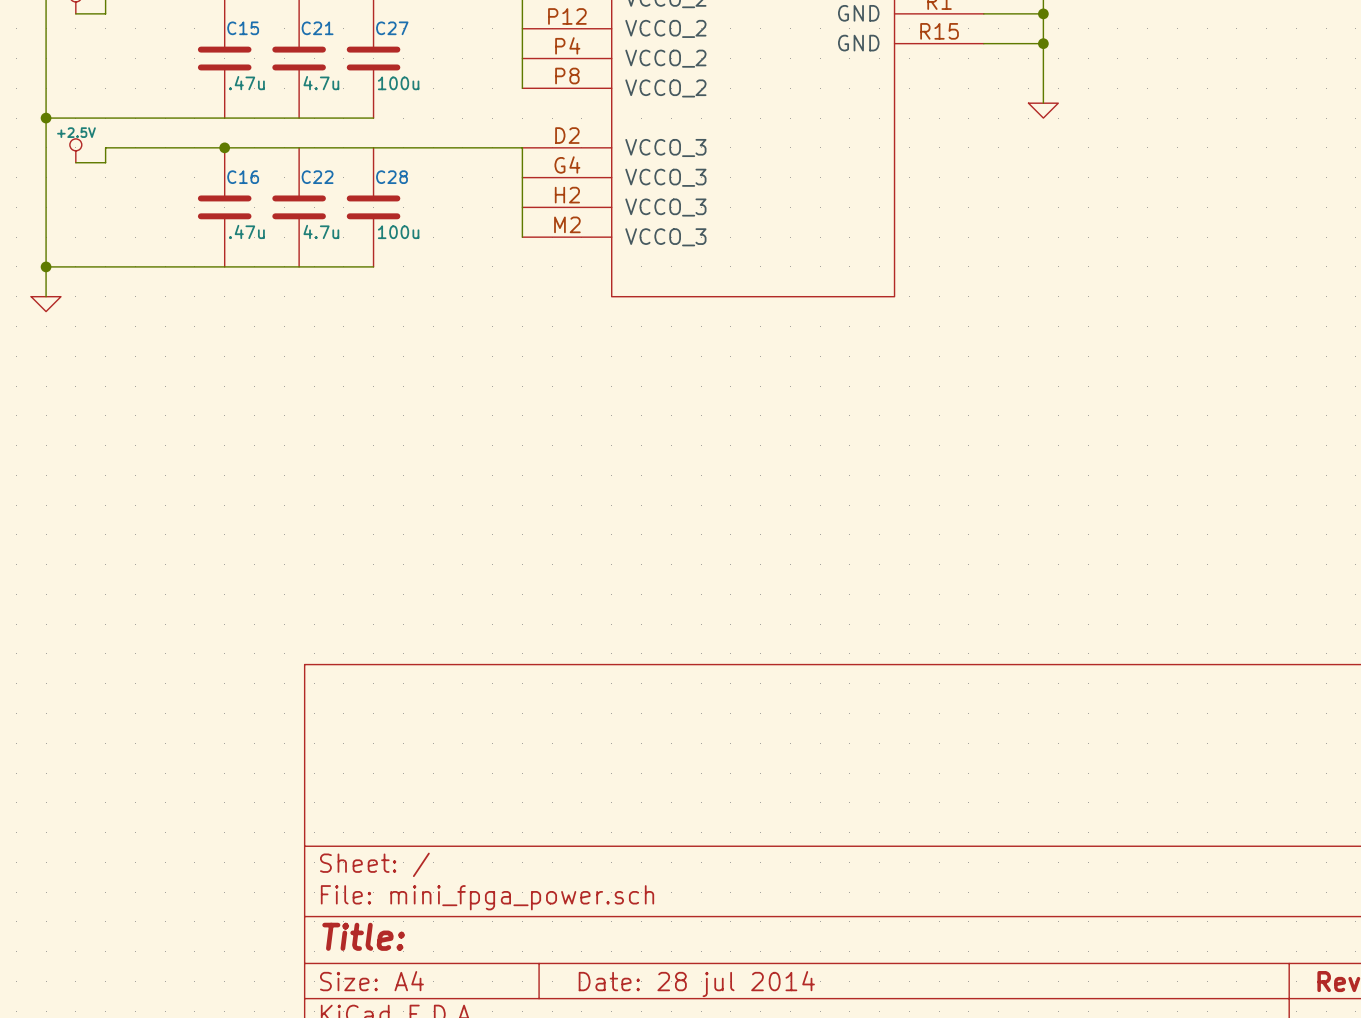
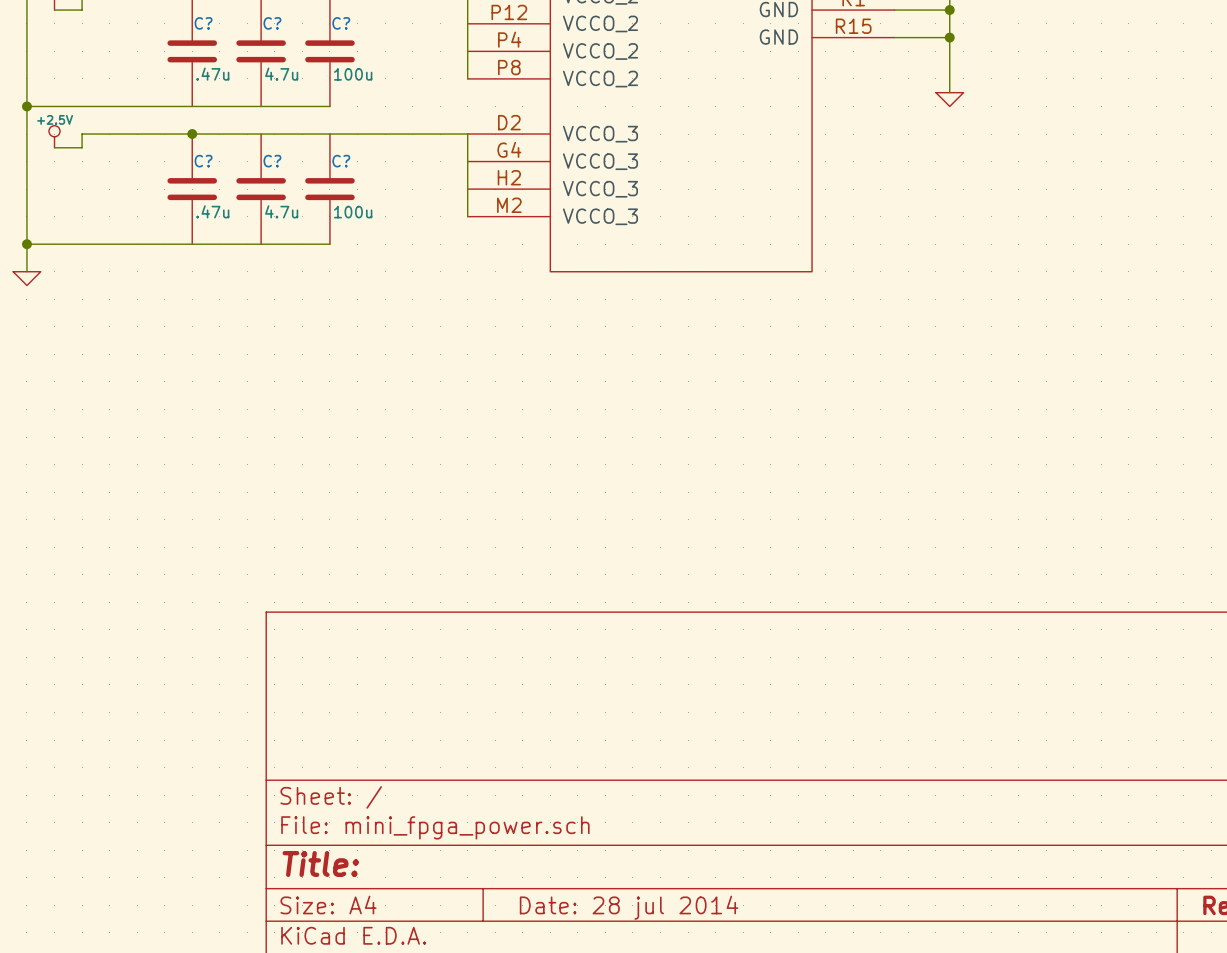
C15 name: C15 (243, 28) -> C? (203, 23)
C21 name: C21 (317, 28) -> C? (272, 23)
C27 name: C27 (392, 28) -> C? (341, 23)
C16 name: C16 (243, 177) -> C? (203, 161)
C22 name: C22 (317, 177) -> C? (272, 161)
C28 name: C28 (392, 177) -> C? (341, 161)

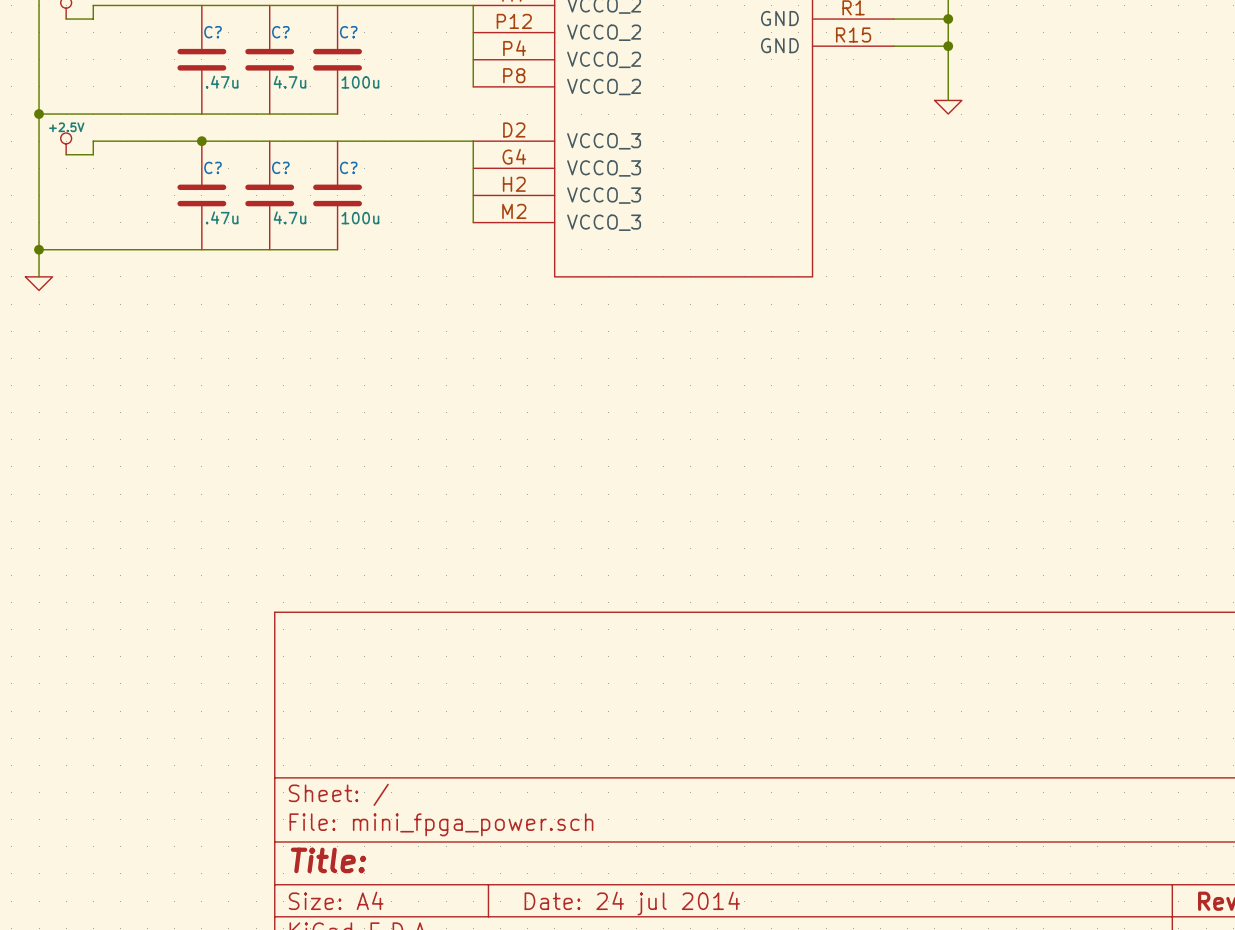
title block: Date: 28 jul 2014 (629, 907) -> Date: 24 jul 2014 (632, 903)

